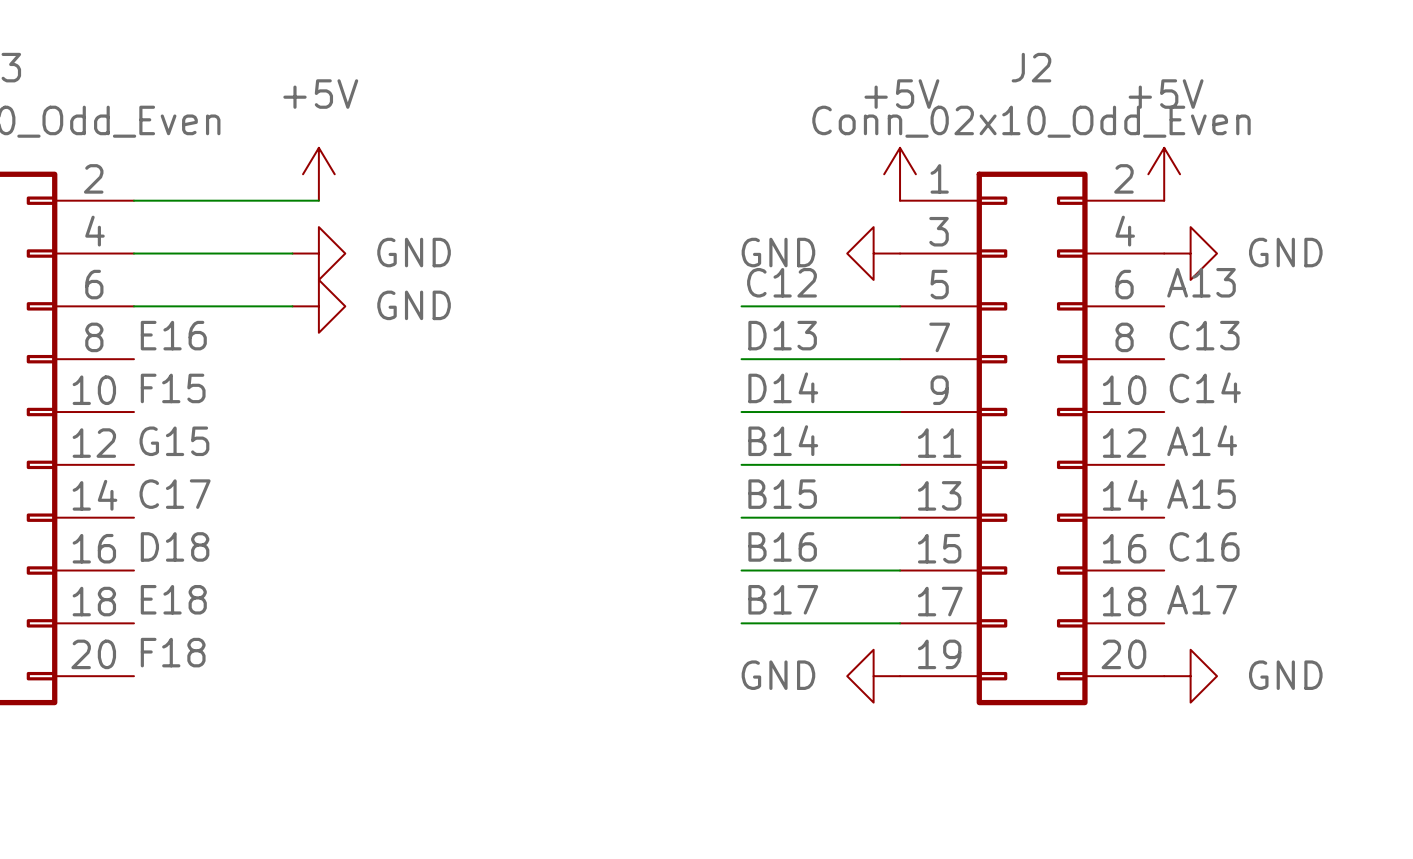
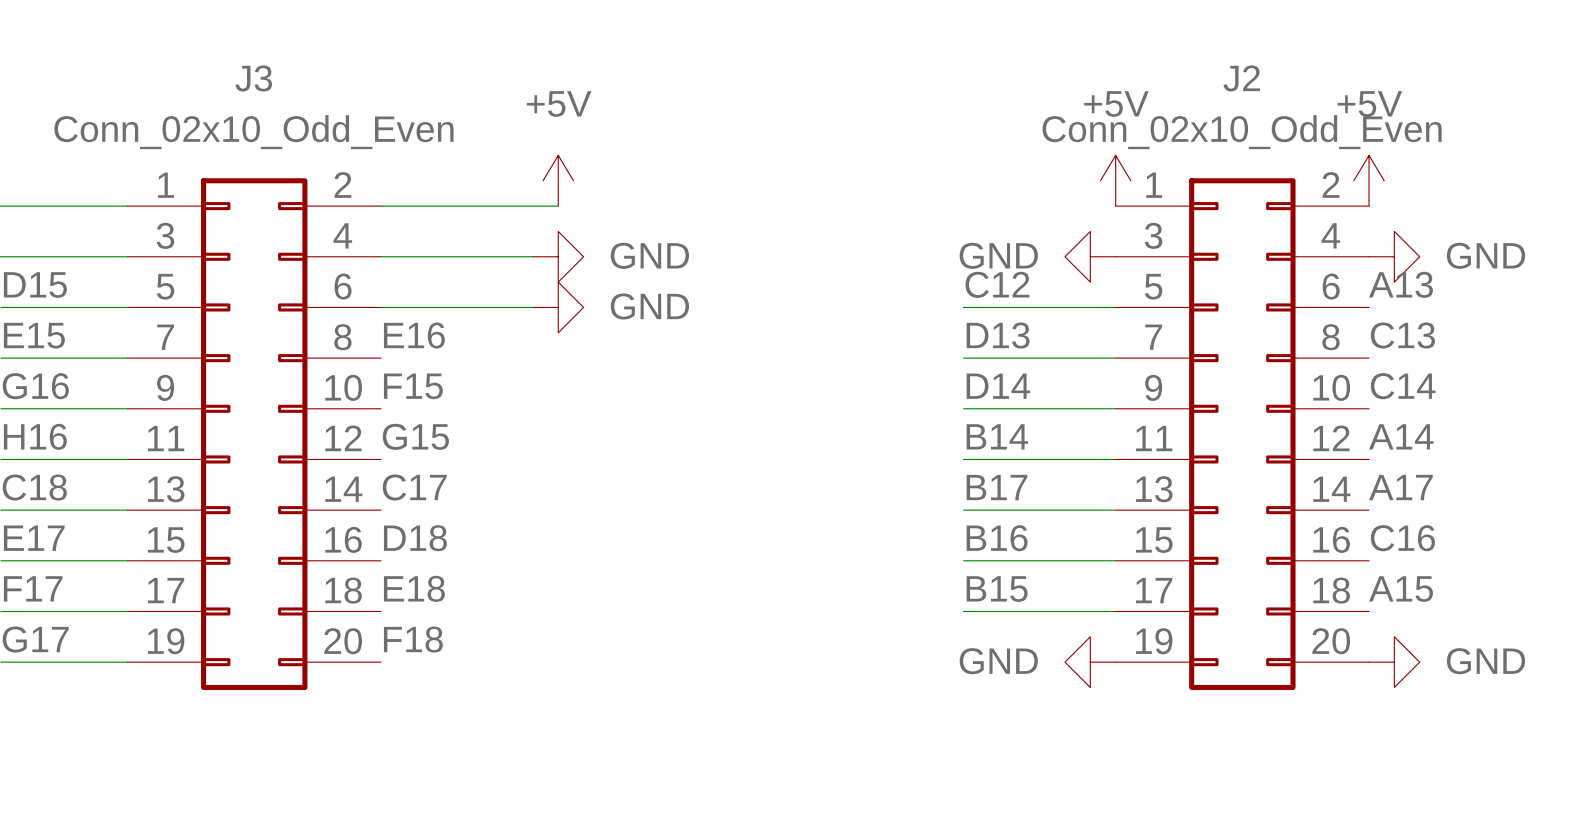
label: B15 (782, 494) -> B17 (996, 487)
label: A15 (1201, 494) -> A17 (1400, 487)
label: B17 (783, 599) -> B15 (997, 589)
label: A17 (1202, 599) -> A15 (1401, 589)

